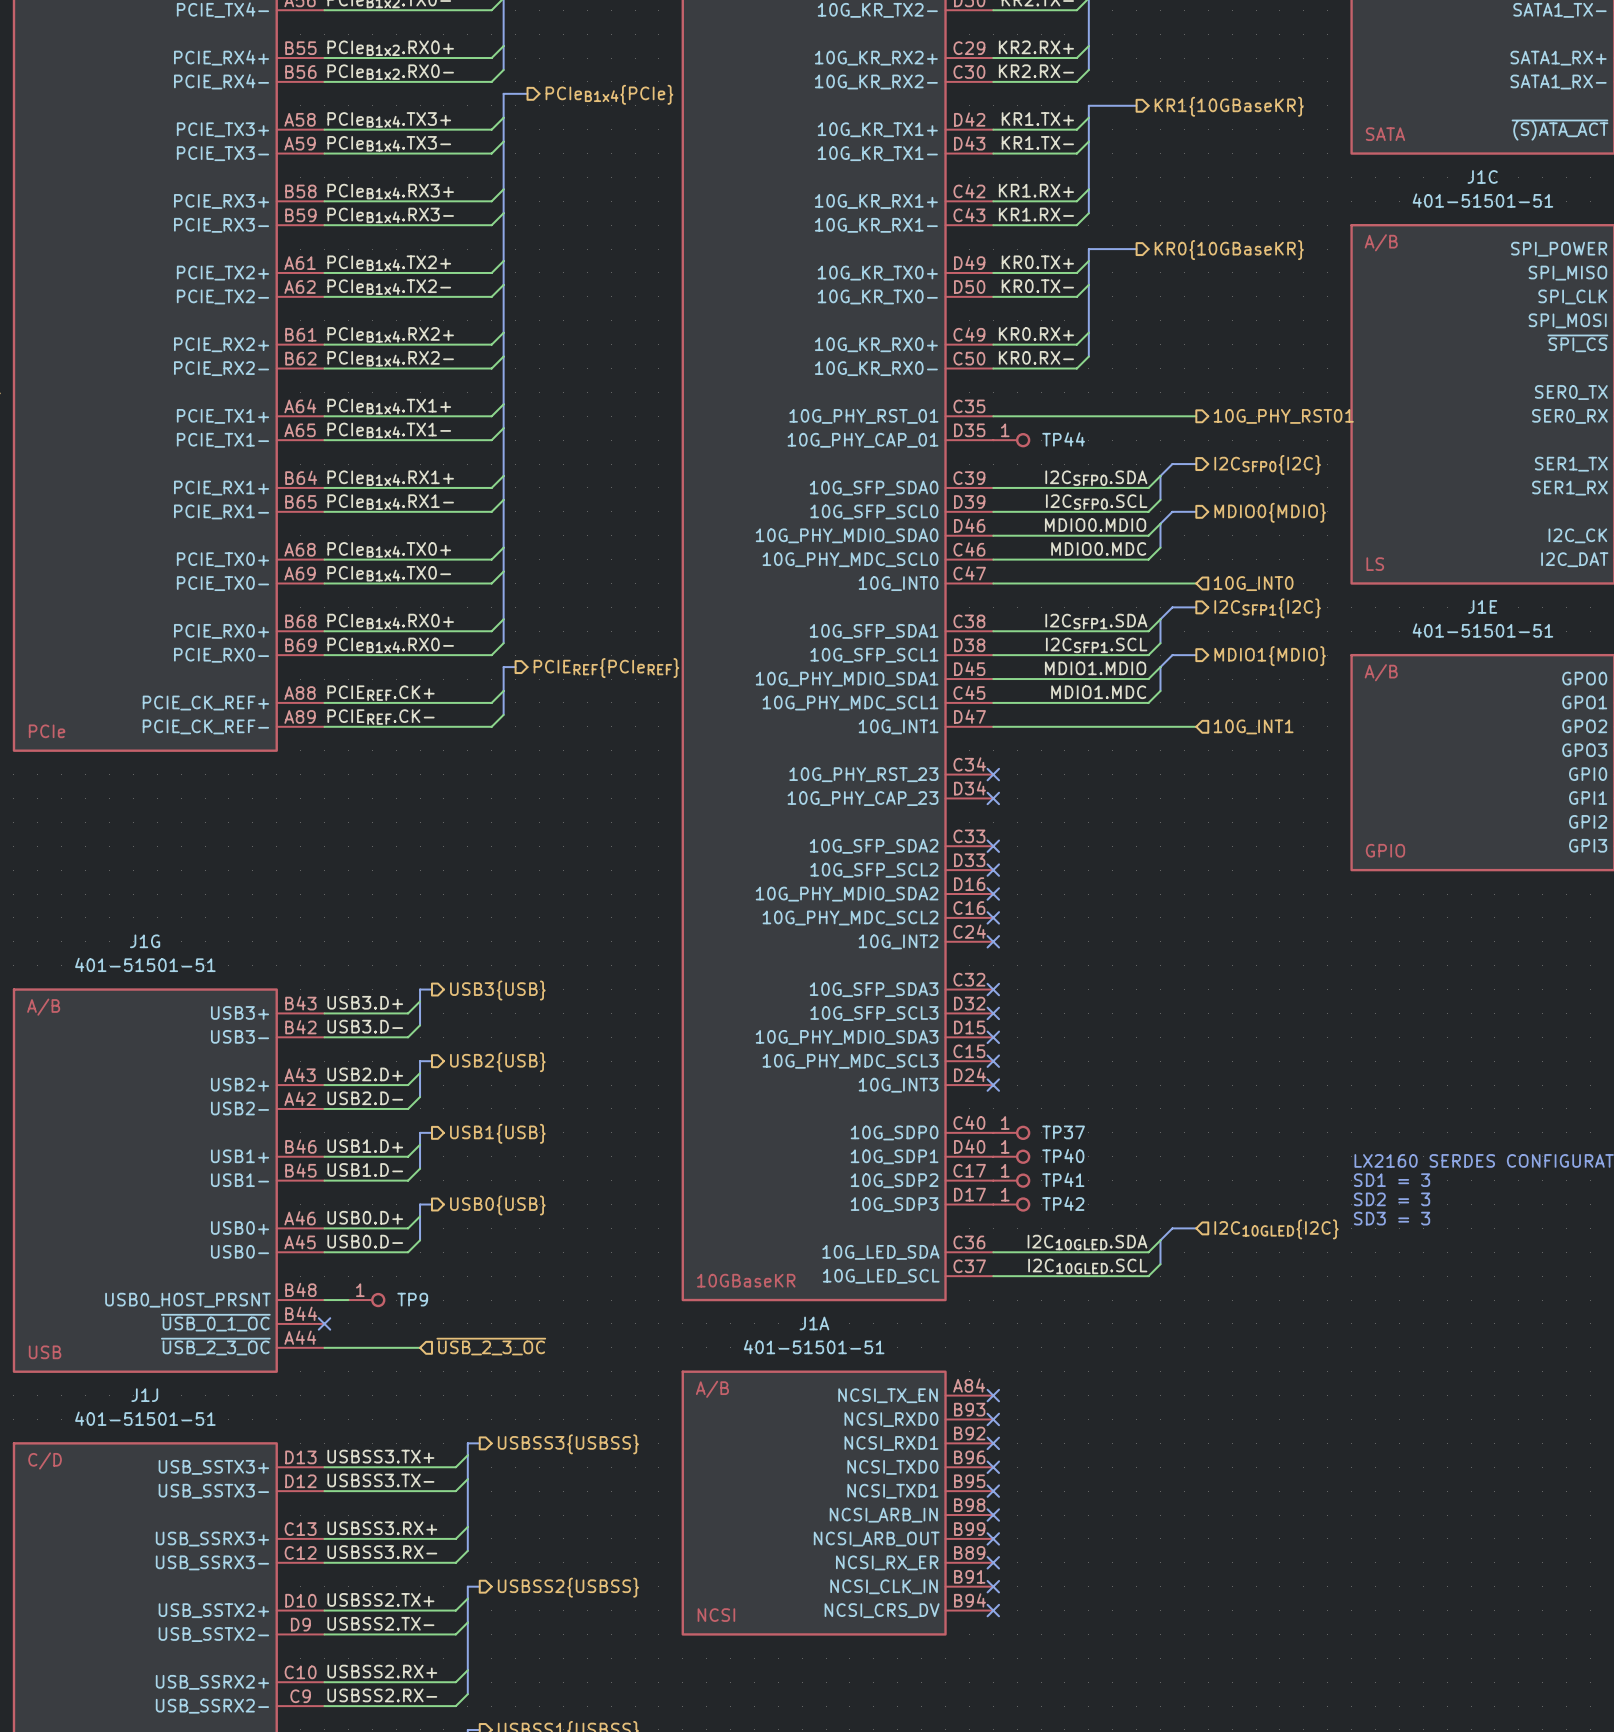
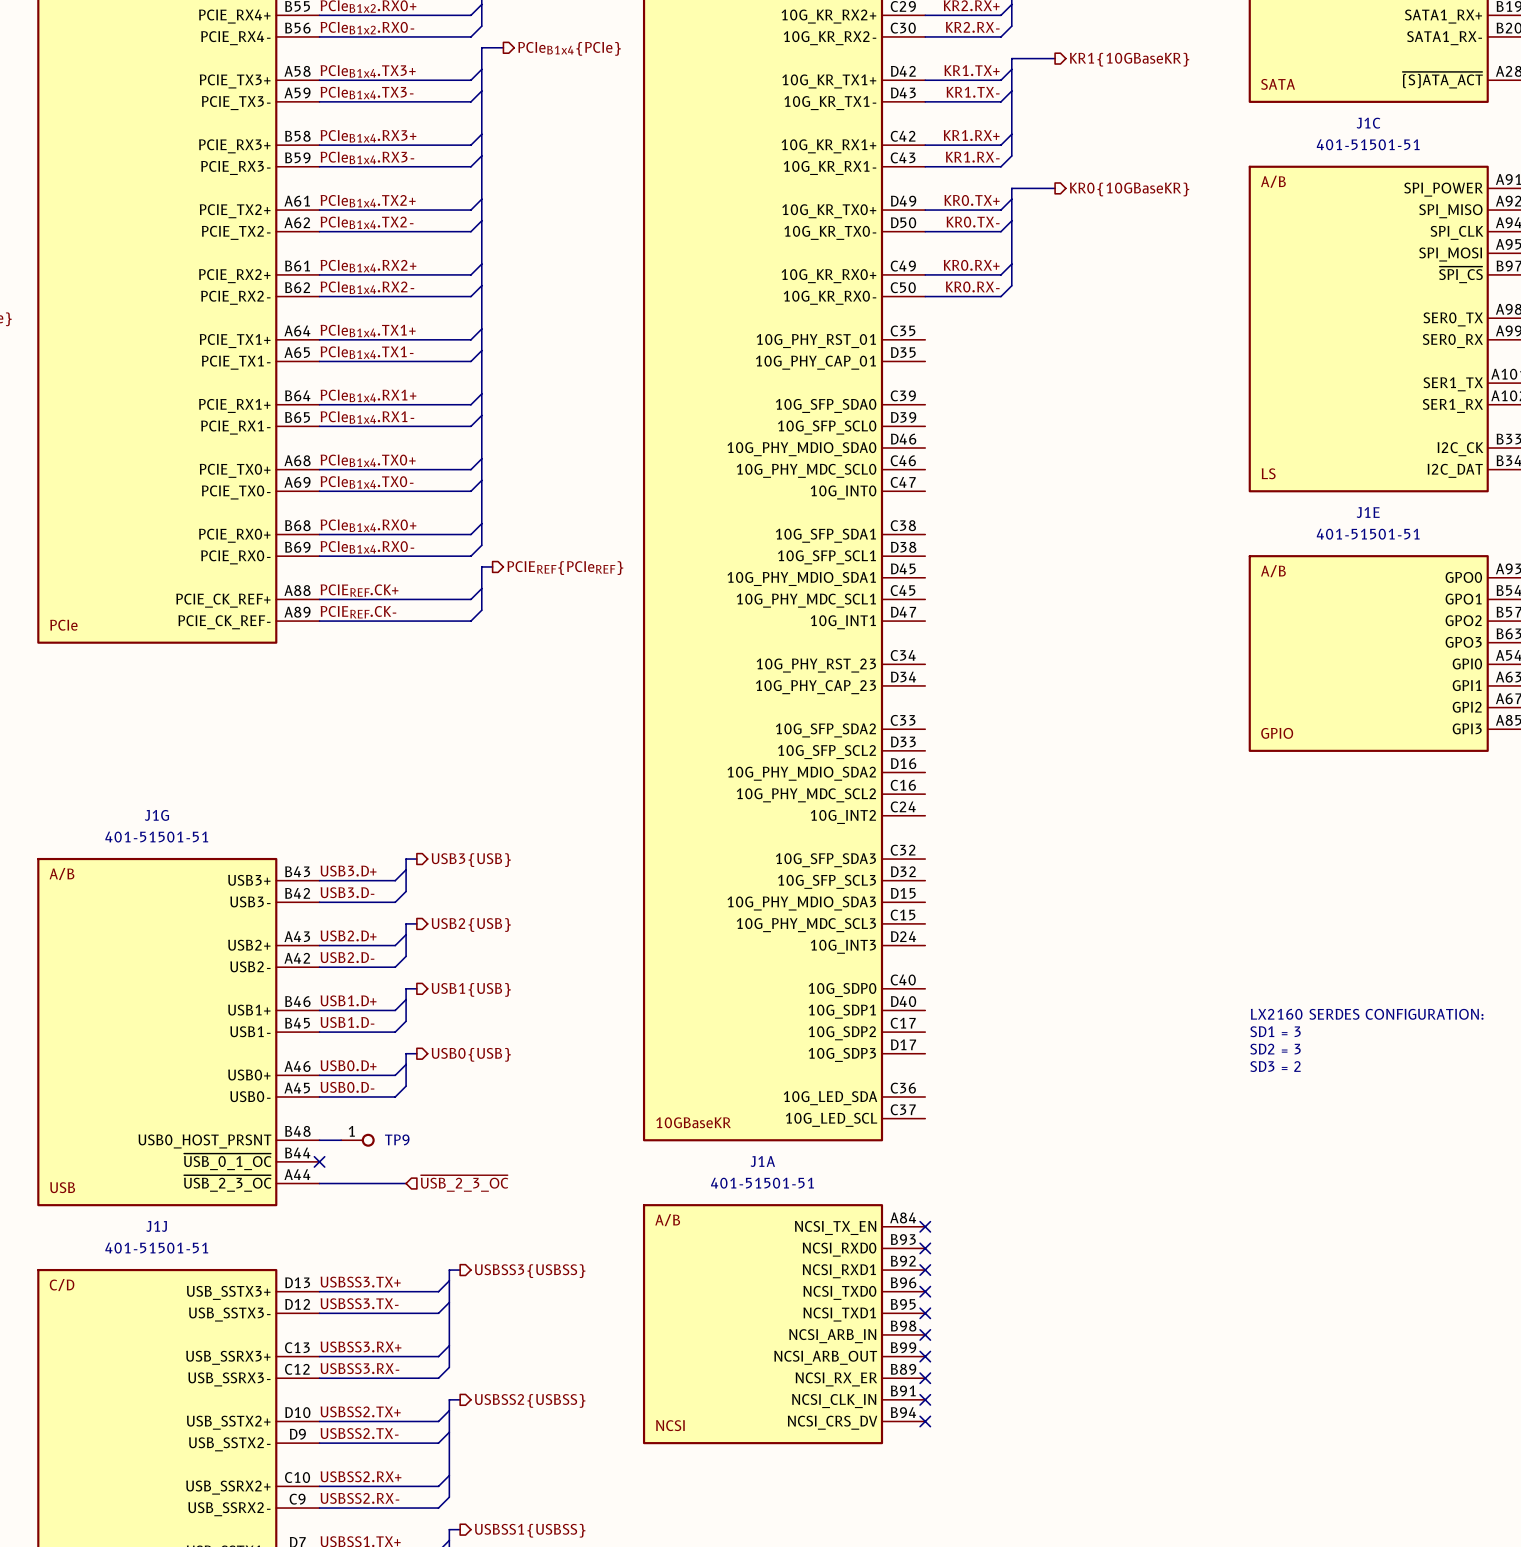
wire: (993, 416) (1196, 416) -> none
hierarchical label: 10G_PHY_RST01 (1283, 416) -> none
TP44: (1011, 440) -> none
bus: (1196, 464) (1172, 464) (1160, 476) (1160, 499) -> none
hierarchical label: I2CSFP0{I2C} (1267, 465) -> none
wire: (1160, 476) (1148, 487) (993, 487) -> none
label: I2CSFP0.SDA (1096, 478) -> none
wire: (1160, 499) (1148, 511) (993, 511) -> none
label: I2CSFP0.SCL (1096, 502) -> none
bus: (1196, 511) (1172, 511) (1160, 523) (1160, 547) -> none
hierarchical label: MDIO0{MDIO} (1270, 512) -> none
wire: (1160, 523) (1148, 535) (993, 535) -> none
label: MDIO0.MDIO (1095, 525) -> none
wire: (1160, 547) (1148, 559) (993, 559) -> none
label: MDIO0.MDC (1098, 548) -> none
wire: (993, 583) (1196, 583) -> none
hierarchical label: 10G_INT0 (1253, 583) -> none
bus: (1196, 607) (1172, 607) (1160, 619) (1160, 643) -> none
hierarchical label: I2CSFP1{I2C} (1267, 608) -> none
wire: (1160, 619) (1148, 631) (993, 631) -> none
label: I2CSFP1.SDA (1096, 621) -> none
wire: (1160, 643) (1148, 655) (993, 655) -> none
label: I2CSFP1.SCL (1096, 645) -> none
bus: (1196, 655) (1172, 655) (1160, 667) (1160, 690) -> none
hierarchical label: MDIO1{MDIO} (1270, 656) -> none
wire: (1160, 667) (1148, 679) (993, 679) -> none
label: MDIO1.MDIO (1095, 668) -> none
wire: (1160, 690) (1148, 702) (993, 702) -> none
label: MDIO1.MDC (1098, 692) -> none
wire: (993, 726) (1196, 726) -> none
hierarchical label: 10G_INT1 (1253, 726) -> none
no-connect mark: (993, 774) -> none
no-connect mark: (993, 798) -> none
no-connect mark: (993, 846) -> none
no-connect mark: (993, 870) -> none
no-connect mark: (993, 894) -> none
no-connect mark: (993, 917) -> none
no-connect mark: (993, 941) -> none
no-connect mark: (993, 989) -> none
no-connect mark: (993, 1013) -> none
no-connect mark: (993, 1037) -> none
no-connect mark: (993, 1061) -> none
no-connect mark: (993, 1085) -> none
TP37: (1011, 1132) -> none
TP40: (1011, 1156) -> none
TP41: (1011, 1180) -> none
TP42: (1011, 1204) -> none
text: SD3 = 3 (1392, 1218) -> SD3 = 2 (1275, 1066)
bus: (1196, 1228) (1172, 1228) (1160, 1240) (1160, 1264) -> none
hierarchical label: I2C10GLED{I2C} (1276, 1229) -> none
wire: (1160, 1240) (1148, 1252) (993, 1252) -> none
label: I2C10GLED.SDA (1087, 1242) -> none
wire: (1160, 1264) (1148, 1276) (993, 1276) -> none
label: I2C10GLED.SCL (1087, 1266) -> none

